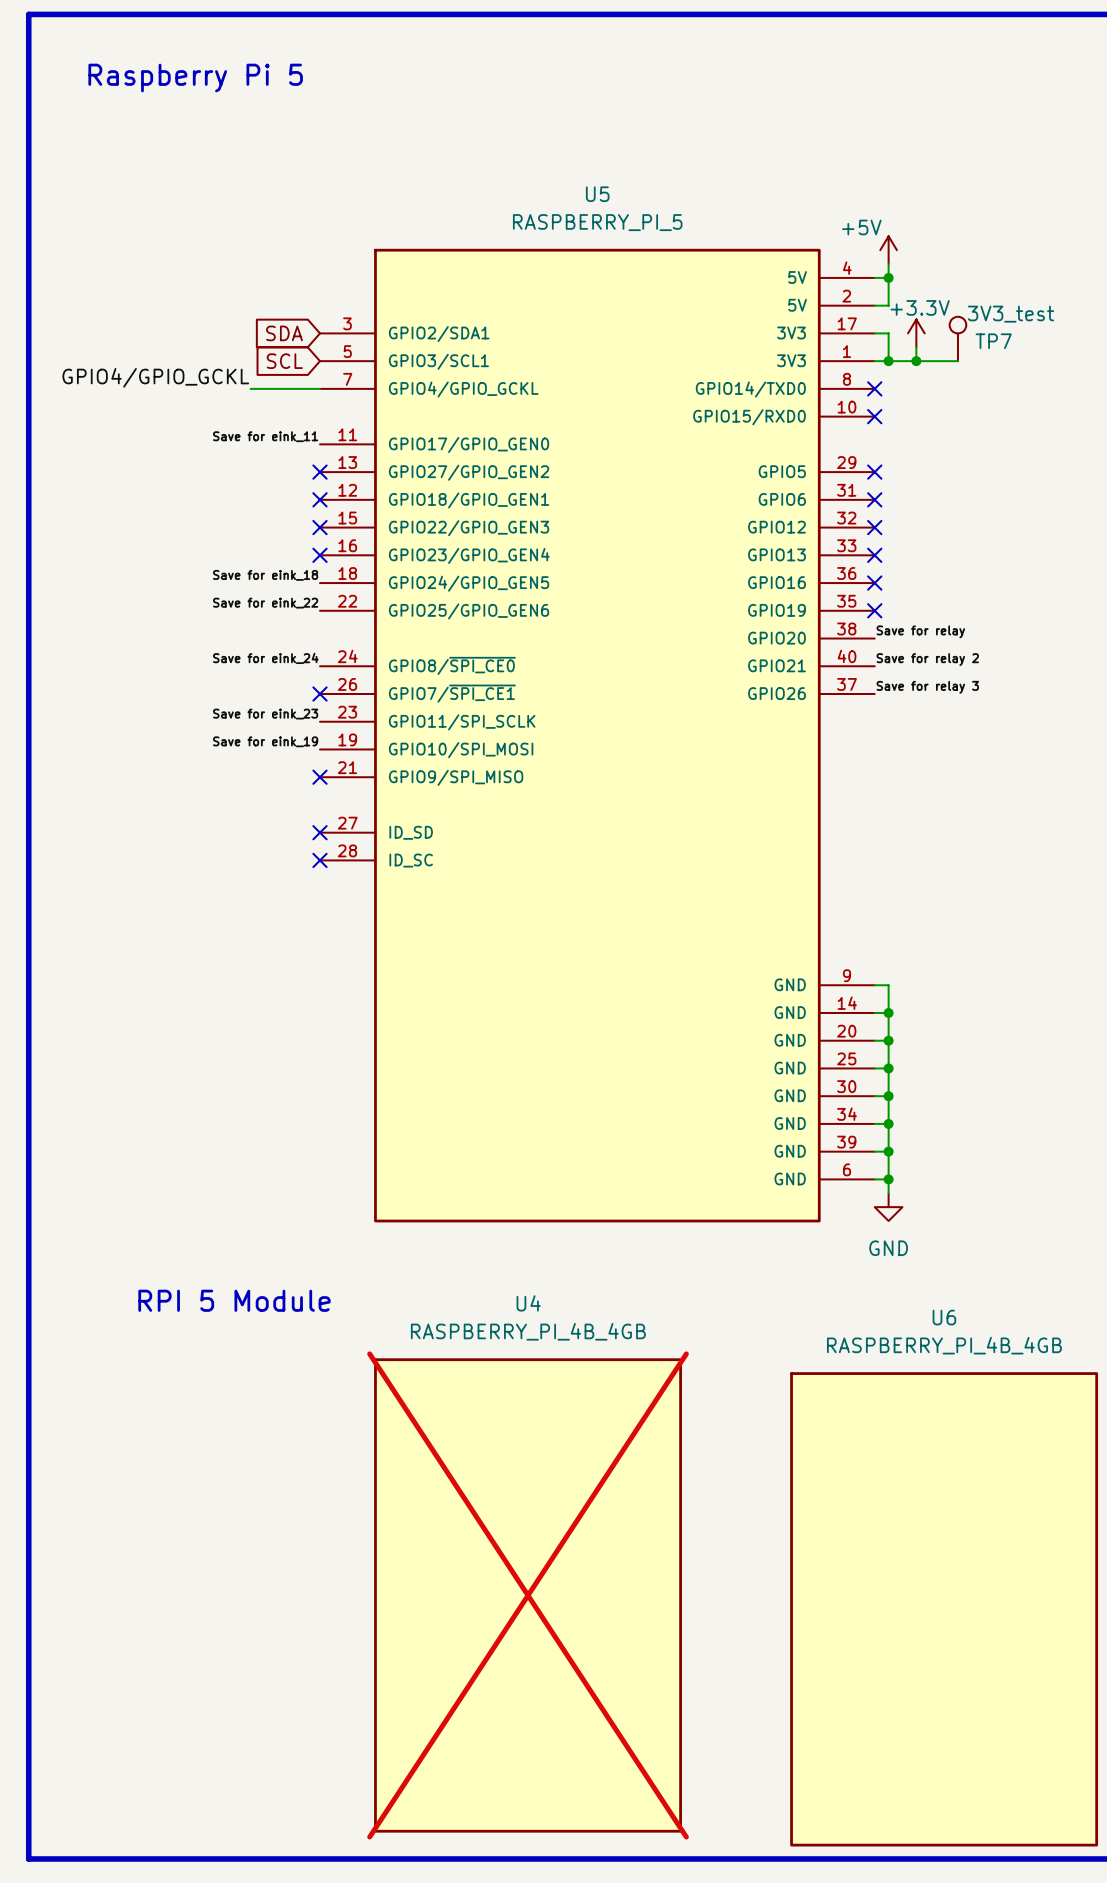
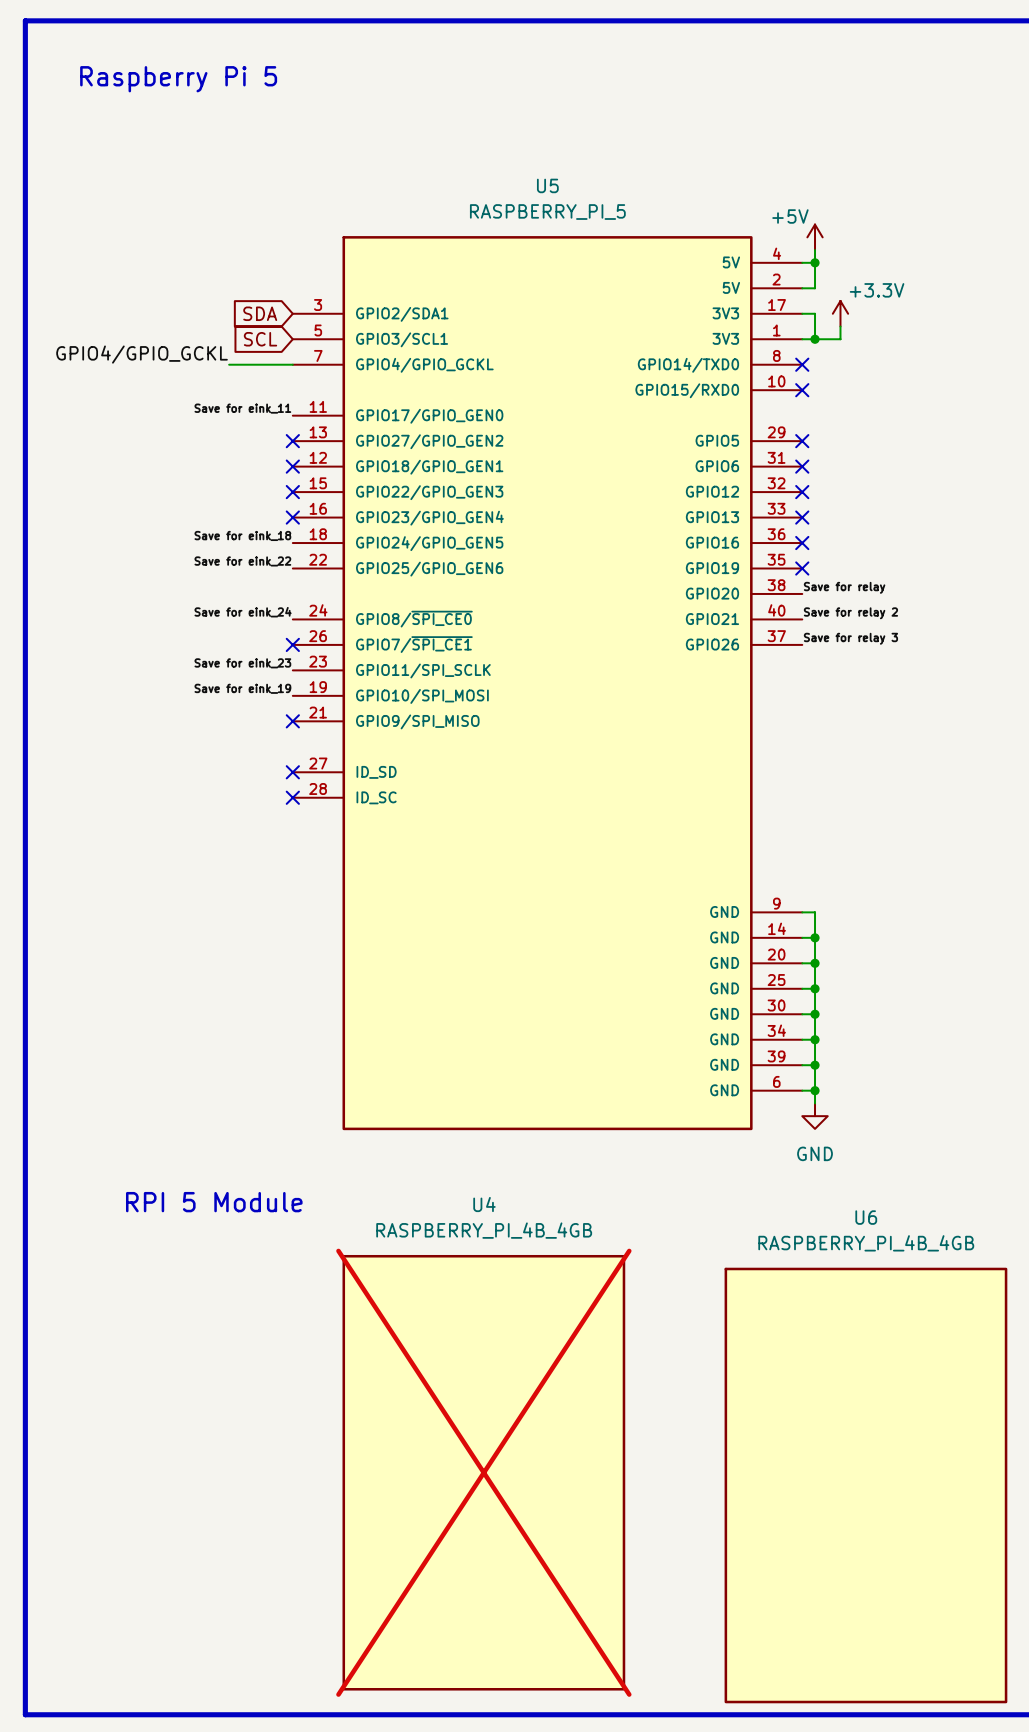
power symbol text position: +3.3V (920, 307) -> +3.3V (877, 290)
TP7: 3V3_test (957, 338) -> none
wire: (916, 361) (957, 361) -> none
junction: (916, 361) -> none

